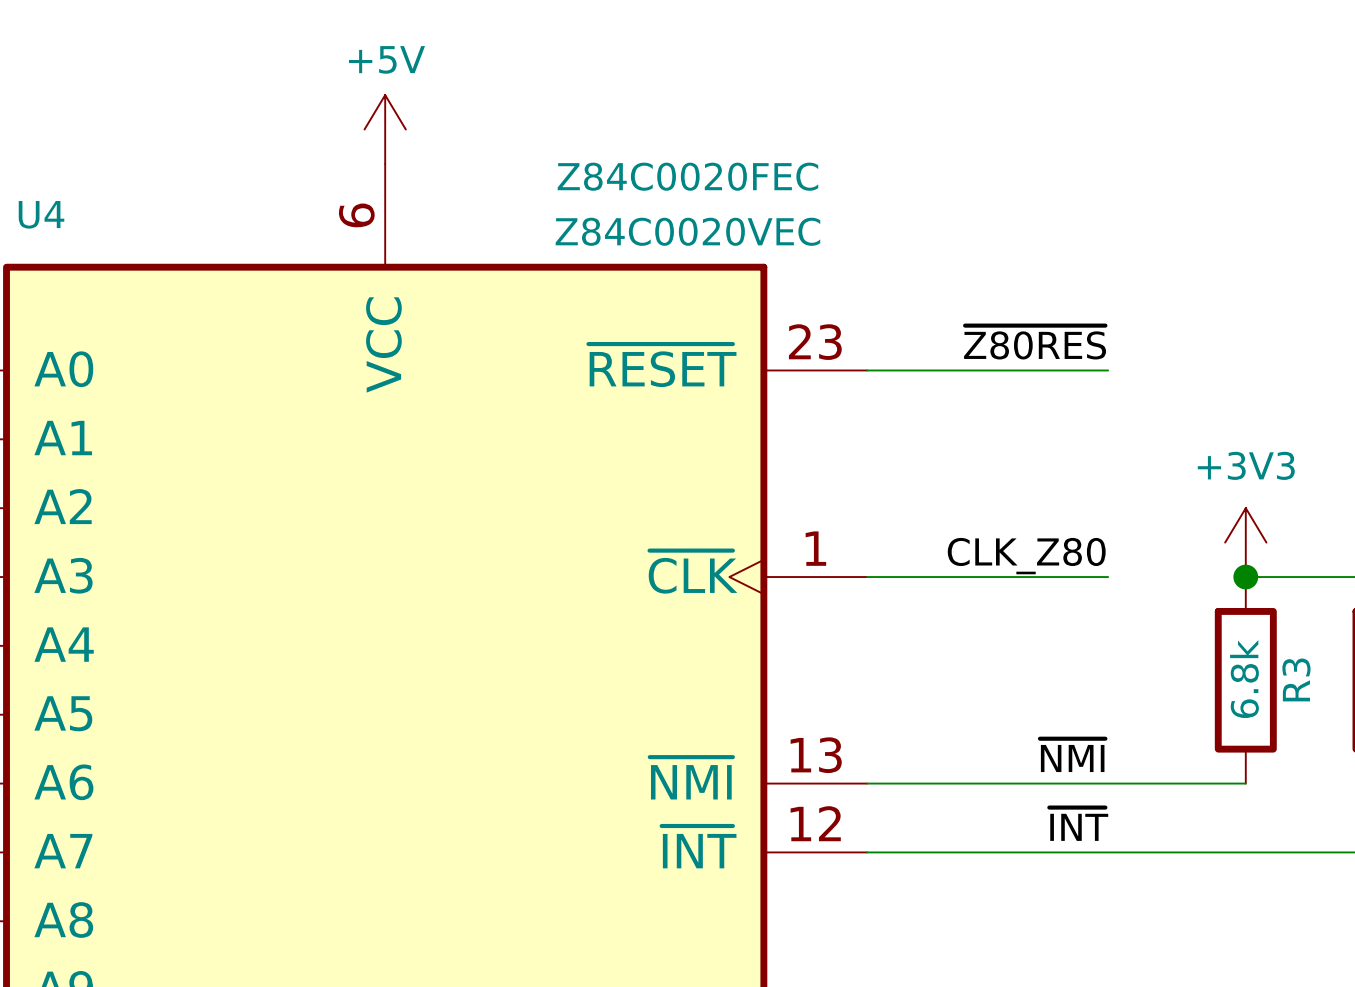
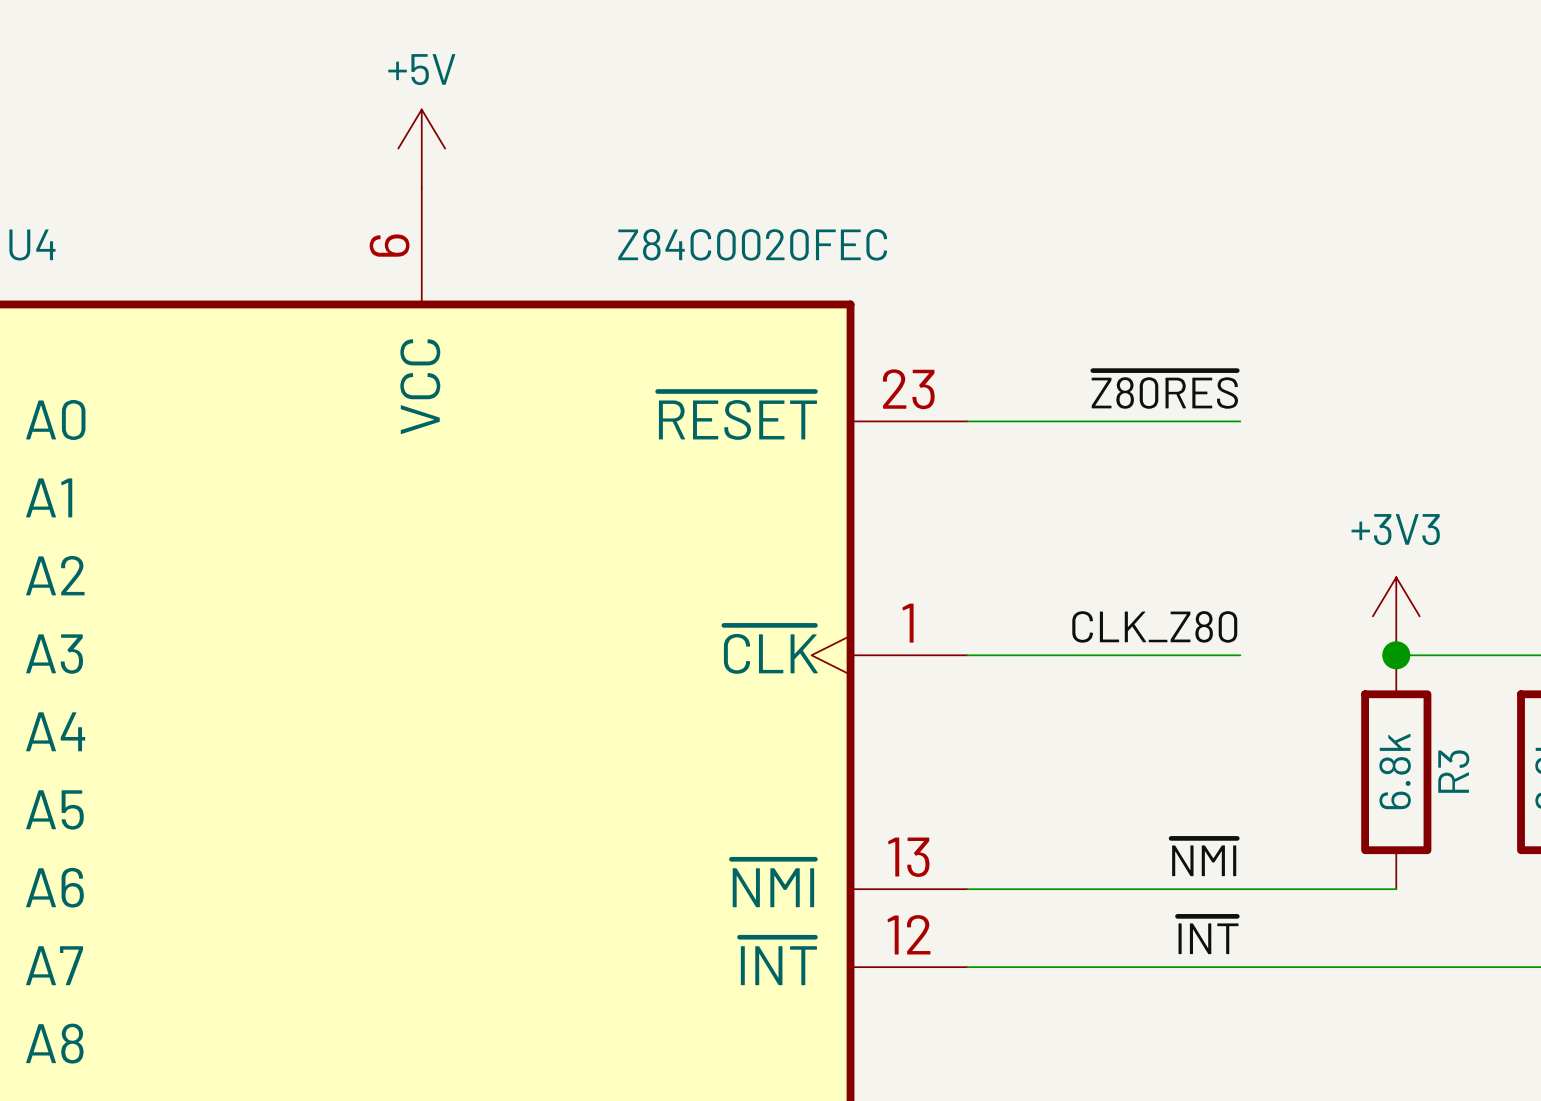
U4 value position: Z84C0020FEC (687, 176) -> Z84C0020FEC (752, 244)
U4 text: Z84C0020VEC (687, 231) -> none

